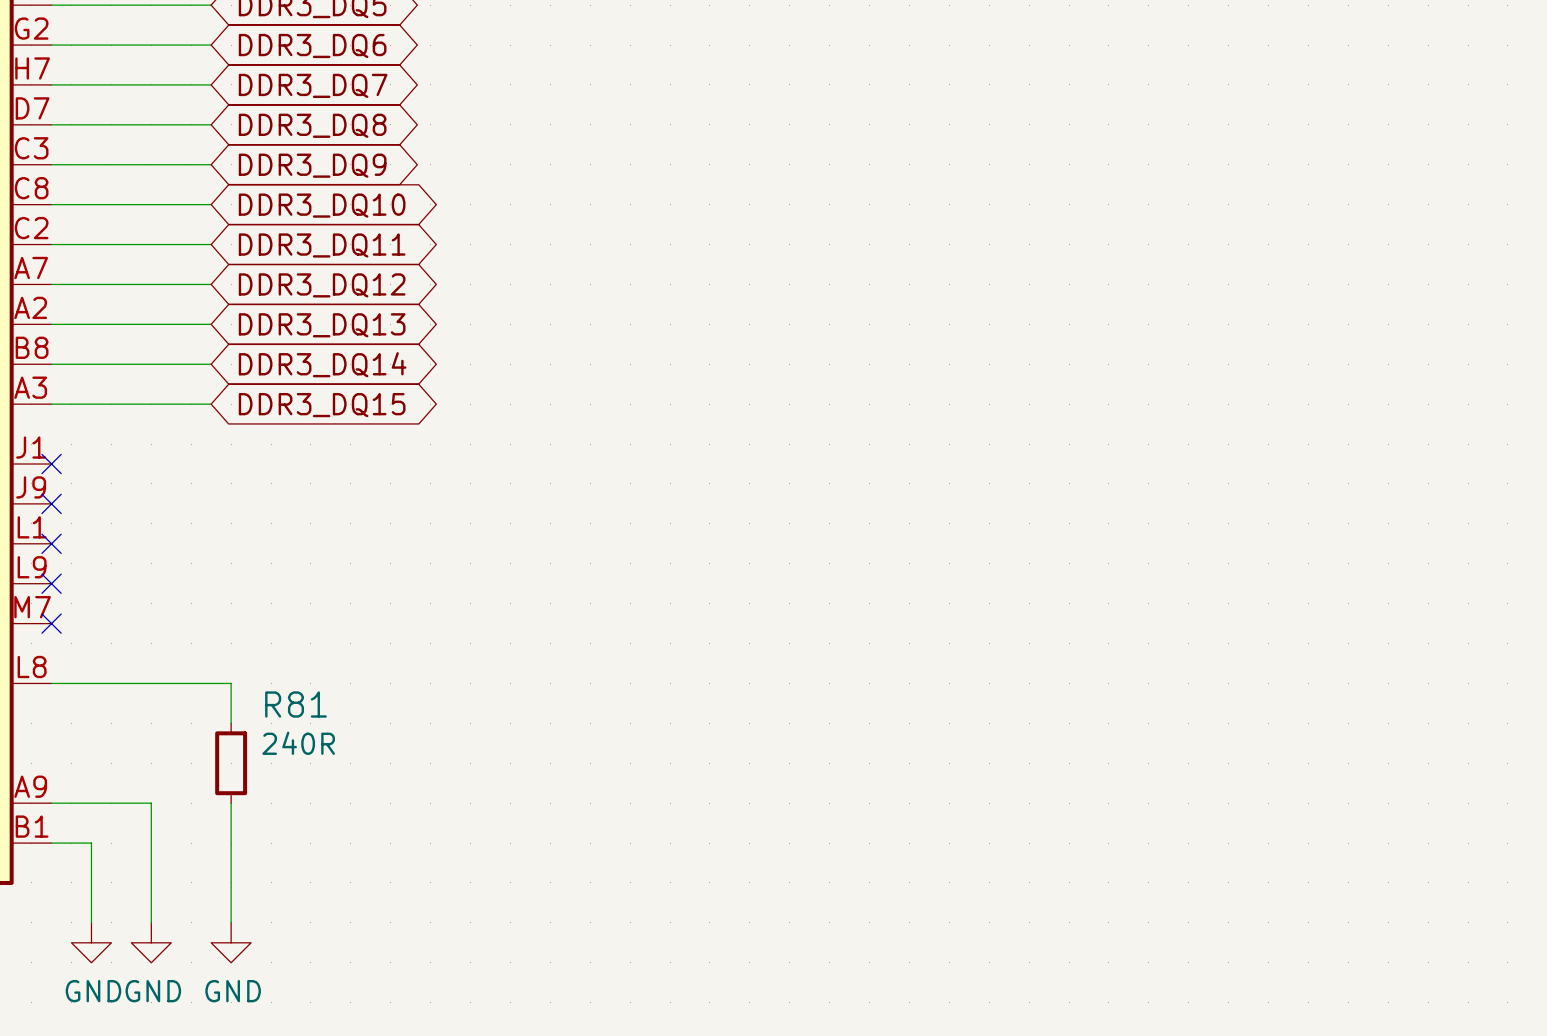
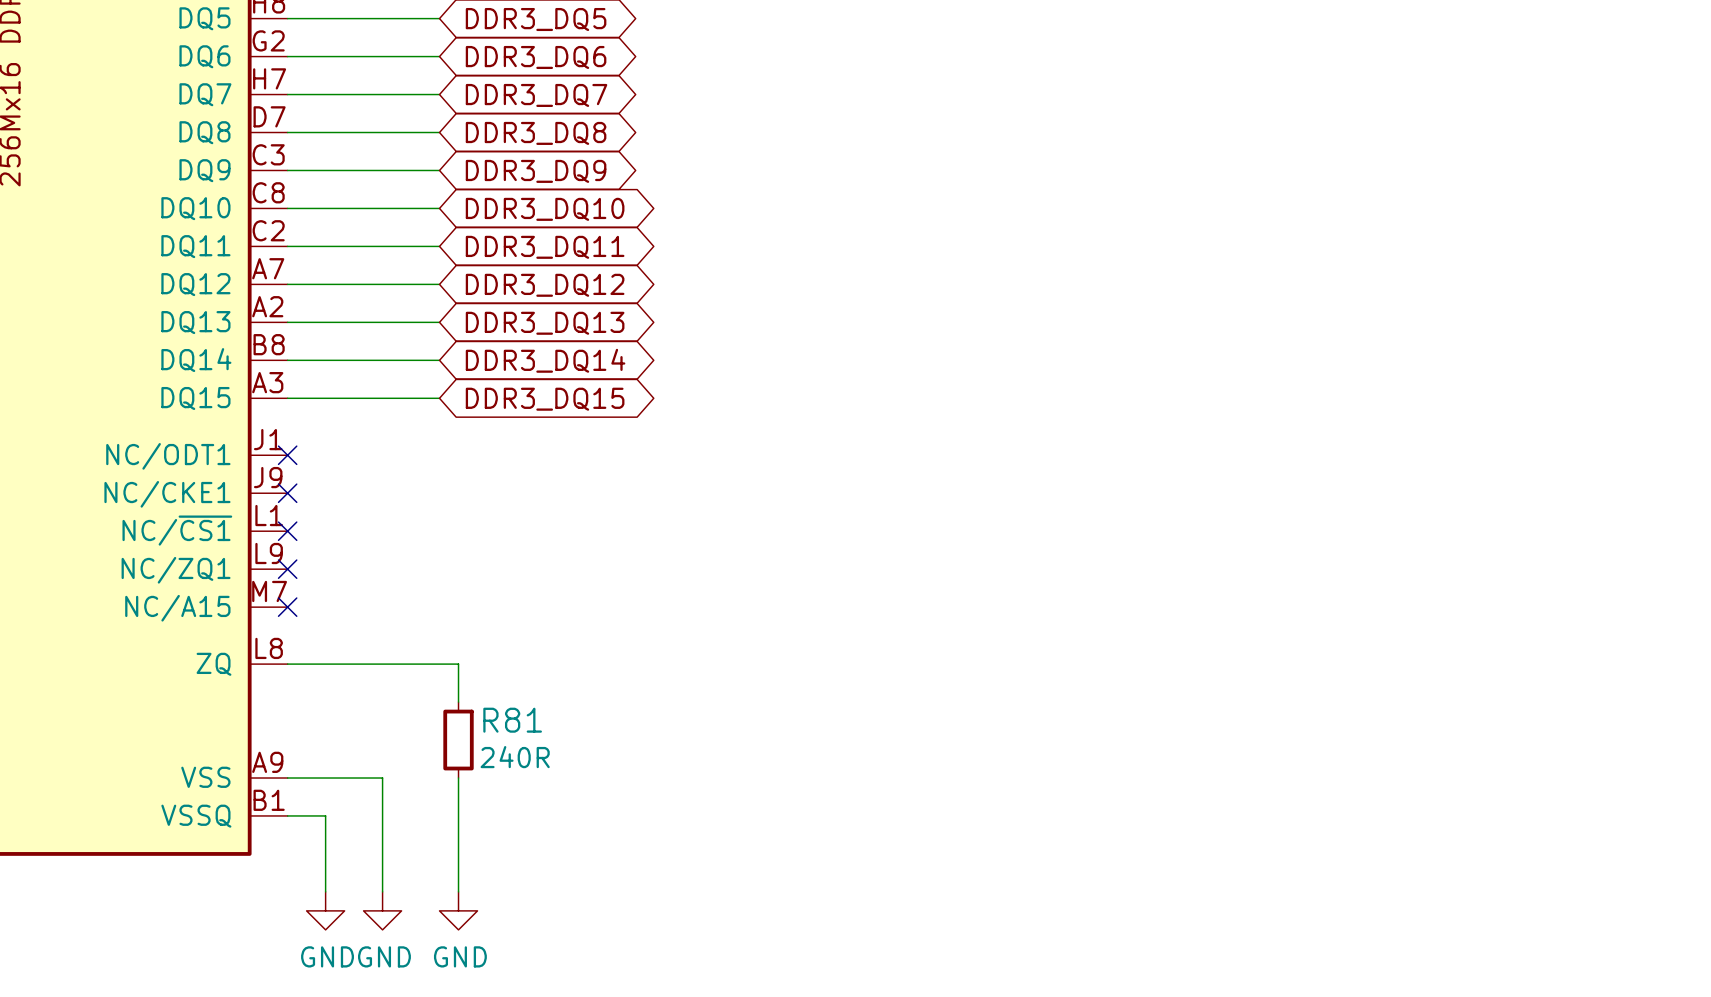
R81 name position: R81 (295, 704) -> R81 (512, 720)
R81 text position: 240R (298, 743) -> 240R (515, 757)

